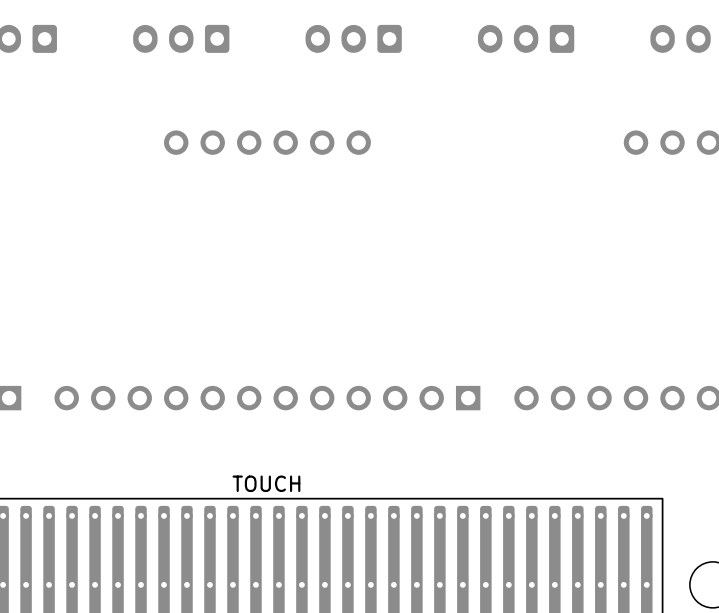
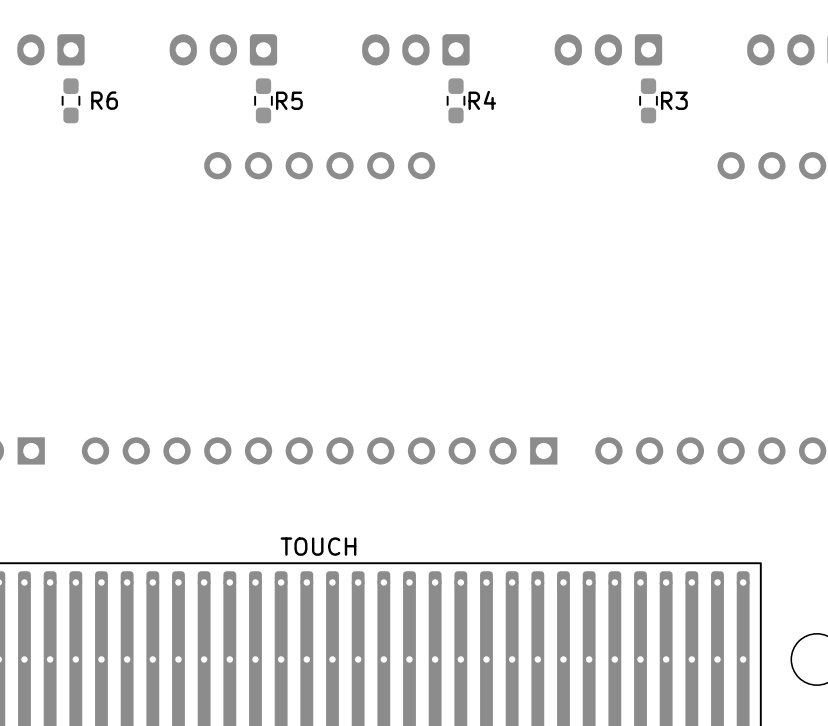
R6: none -> (70, 100)
R5: none -> (263, 100)
R4: none -> (456, 100)
R3: none -> (648, 100)

